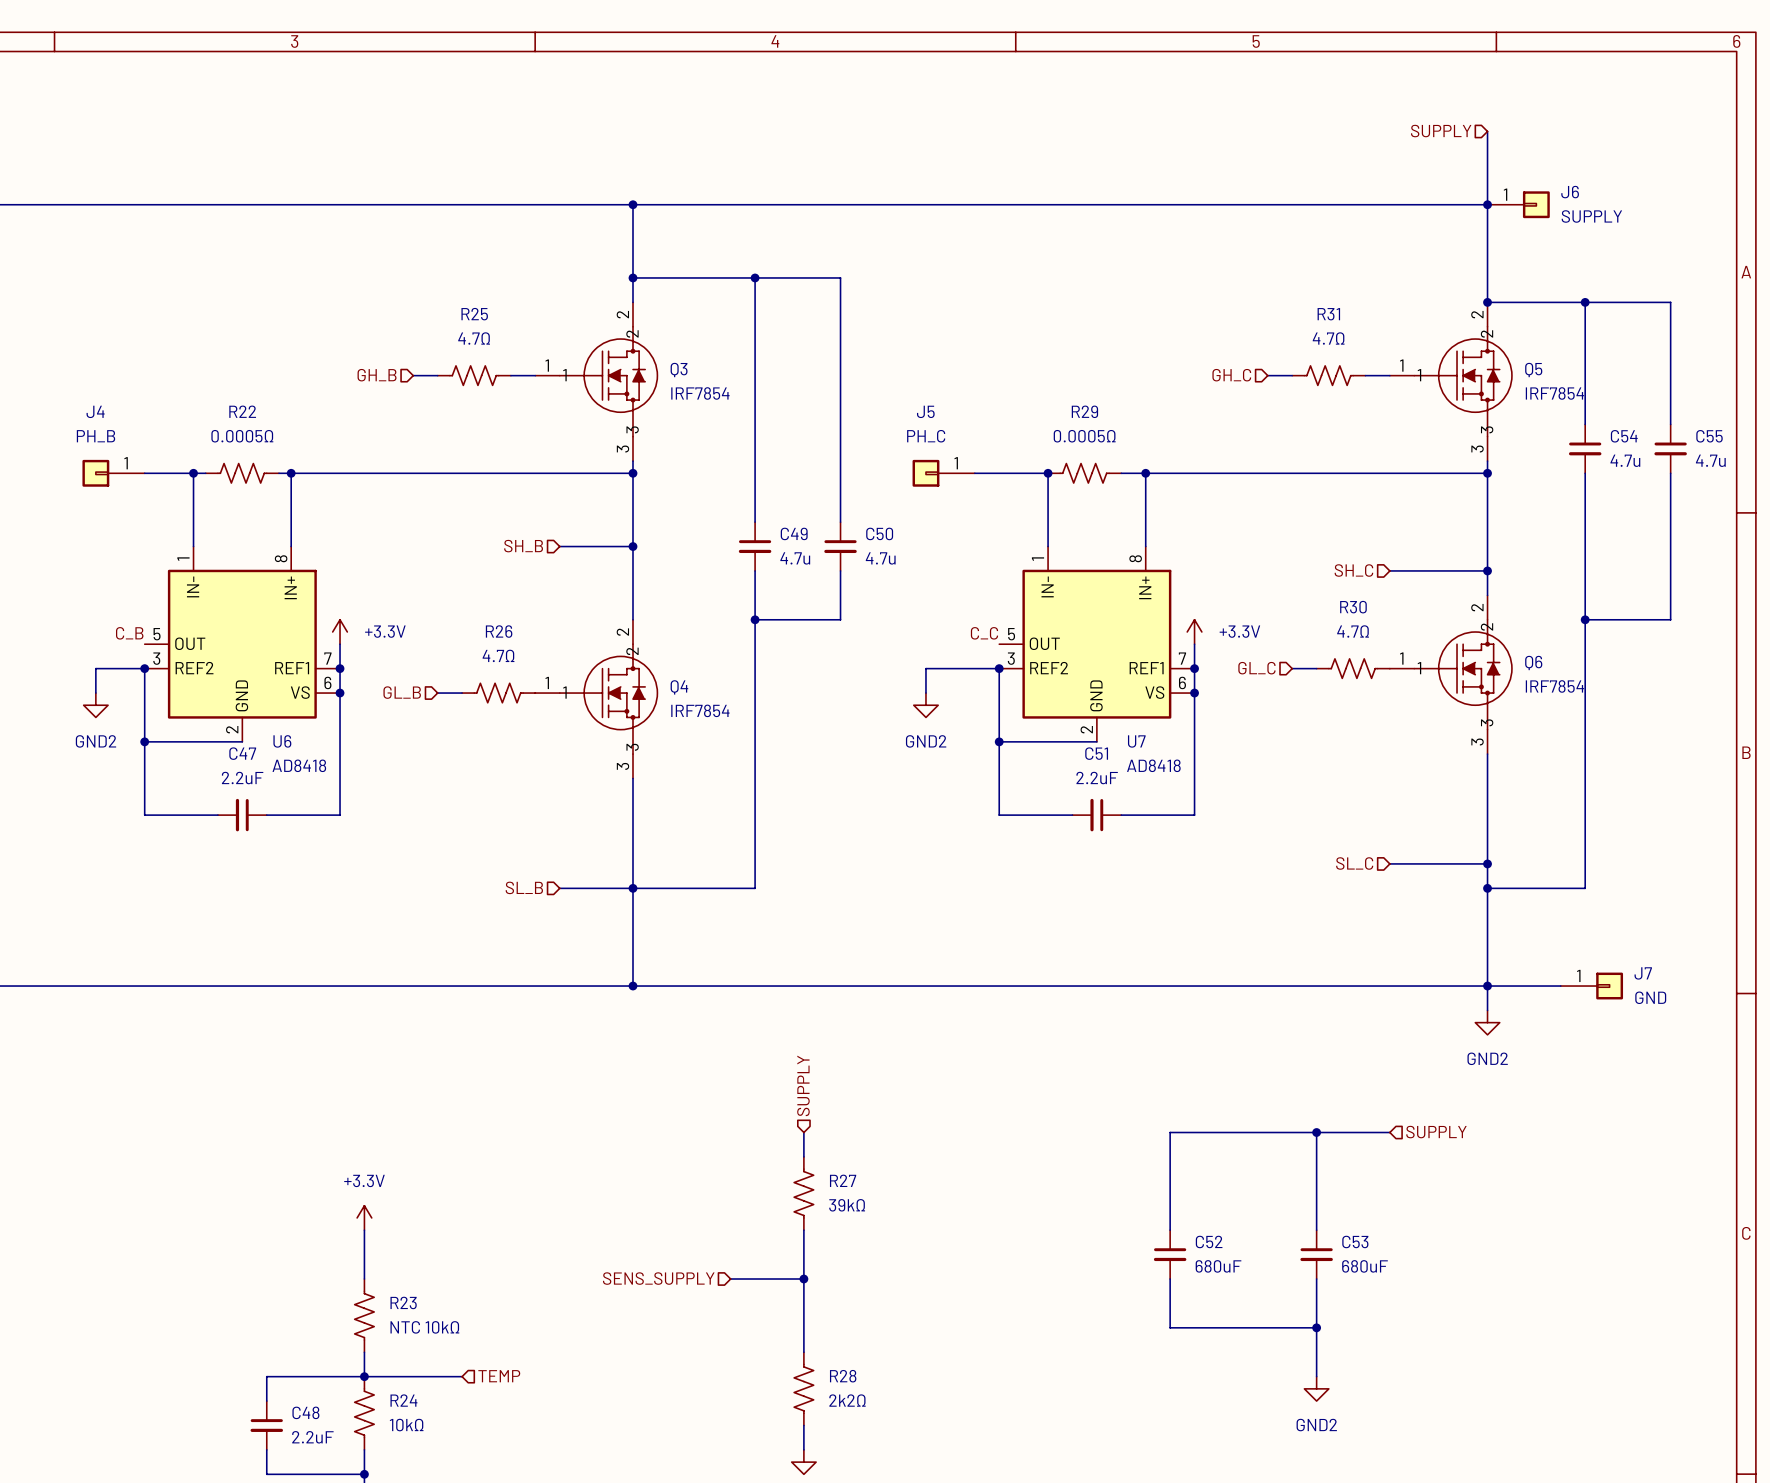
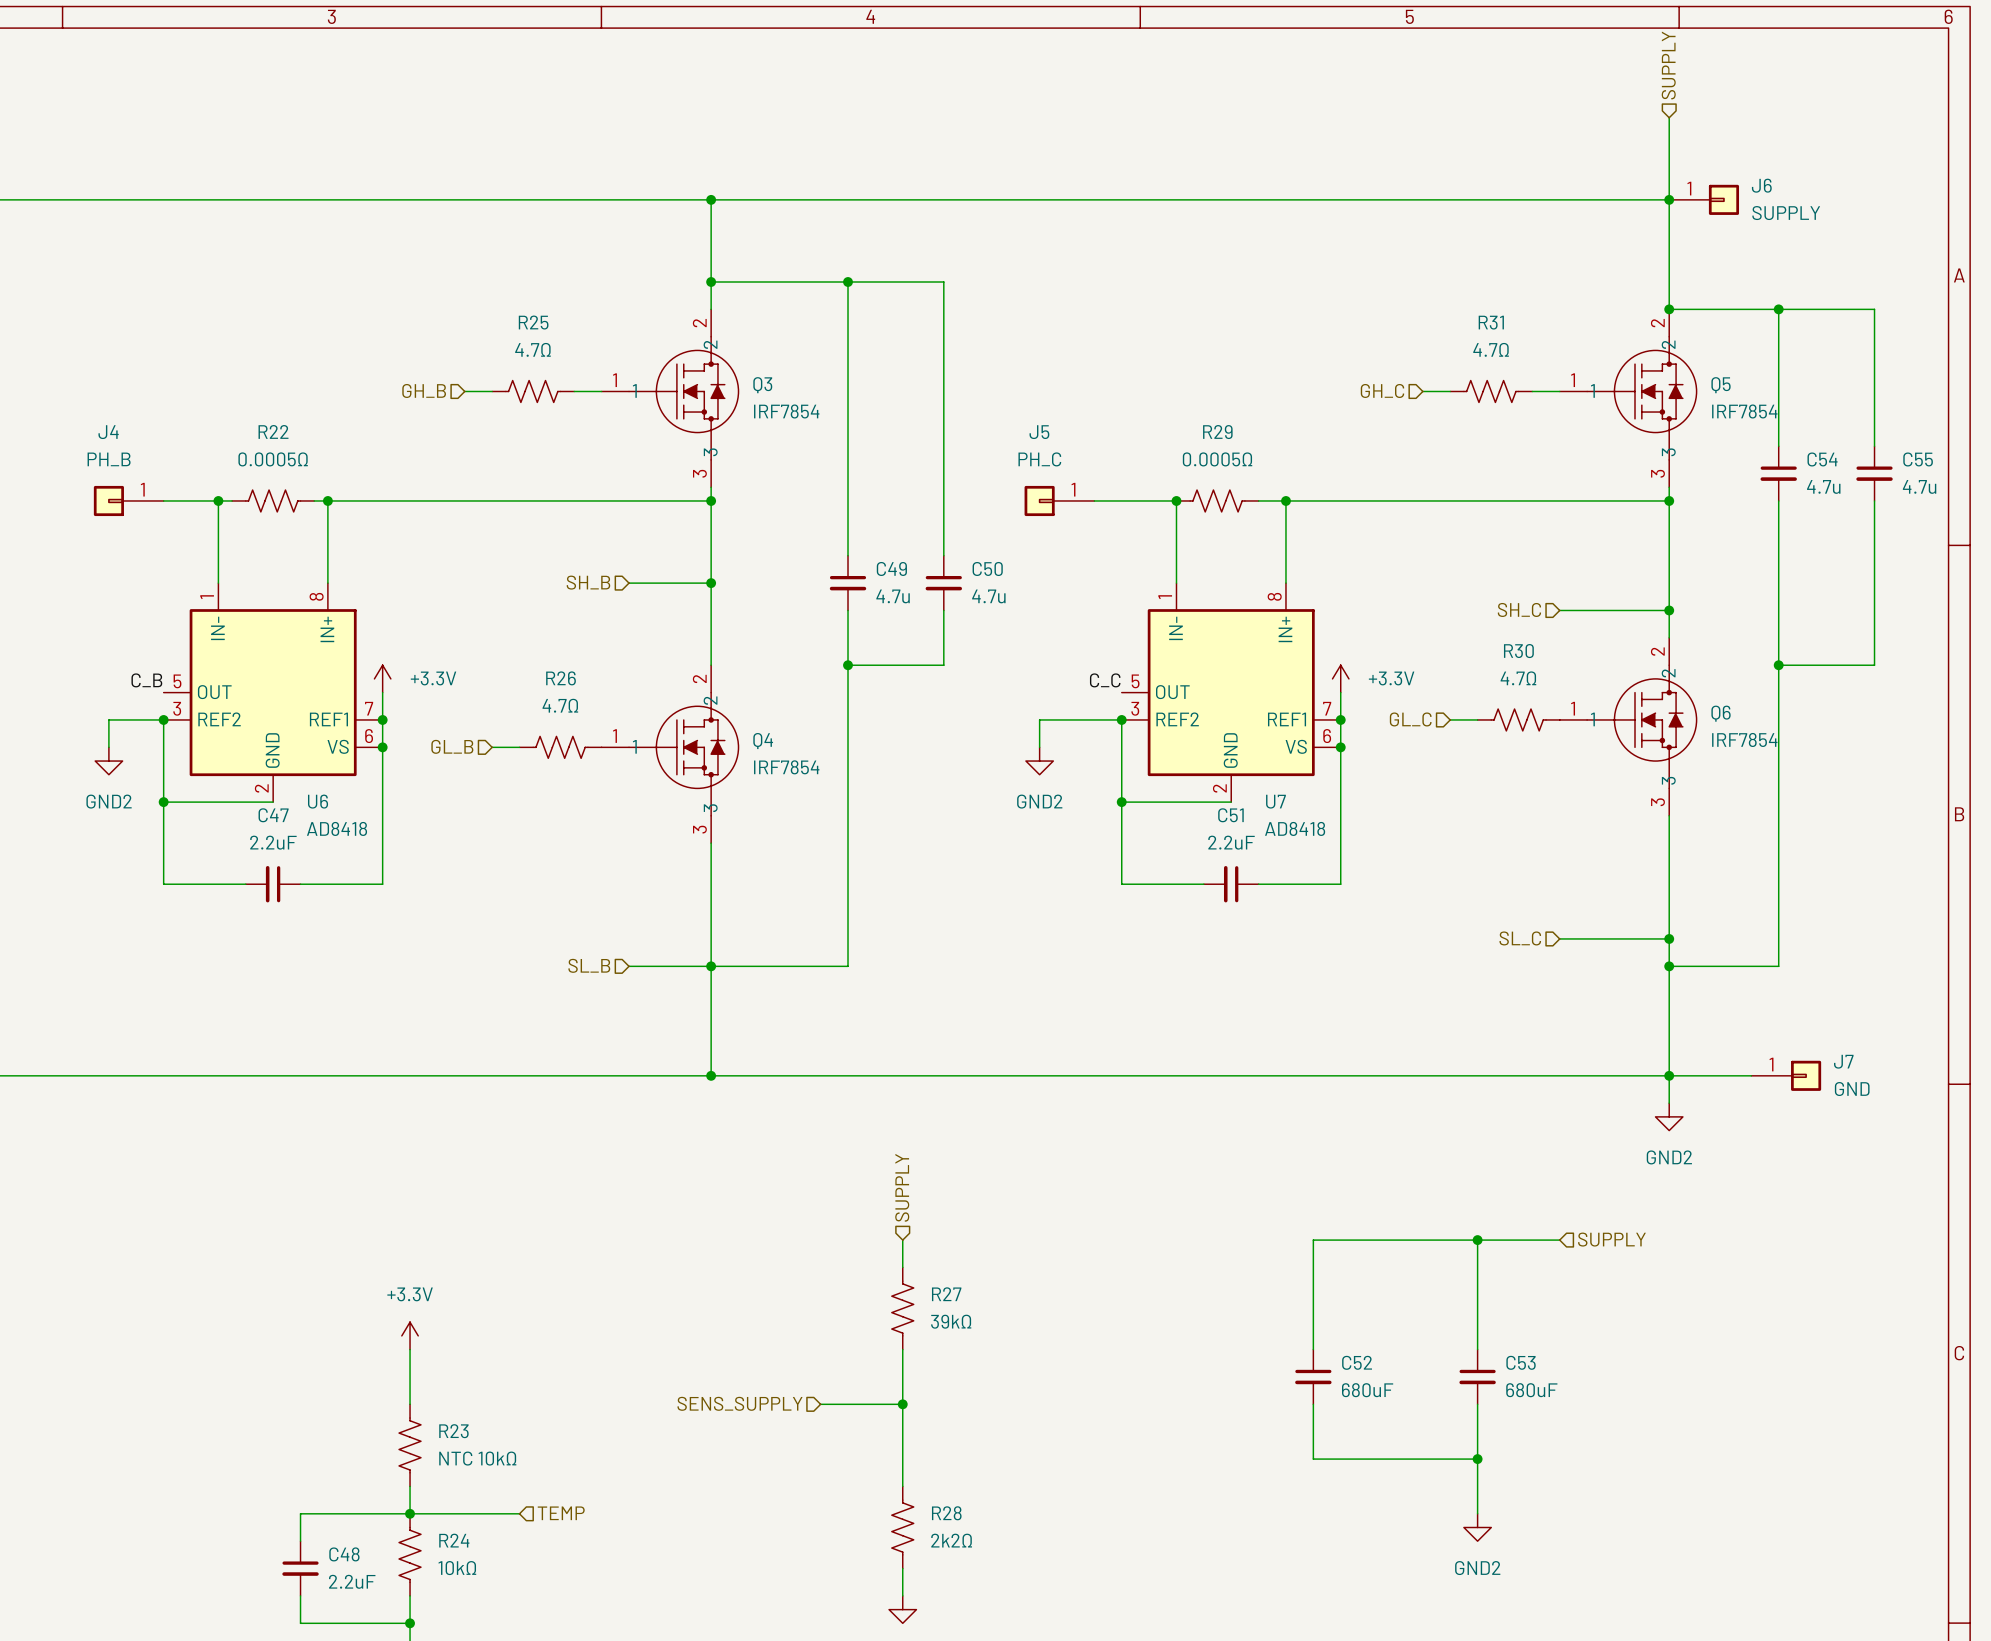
hierarchical label rotation: 0° (1441, 131) -> 90° clockwise (1668, 65)

